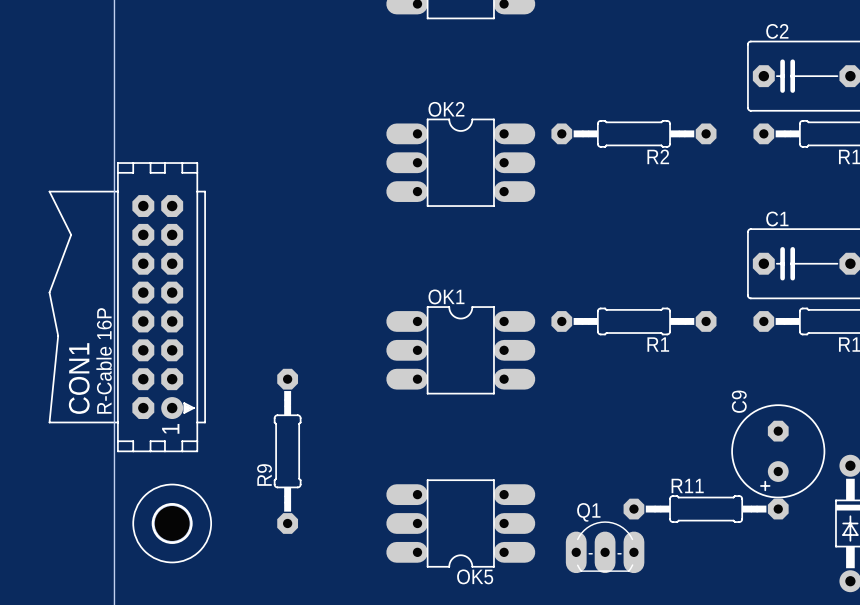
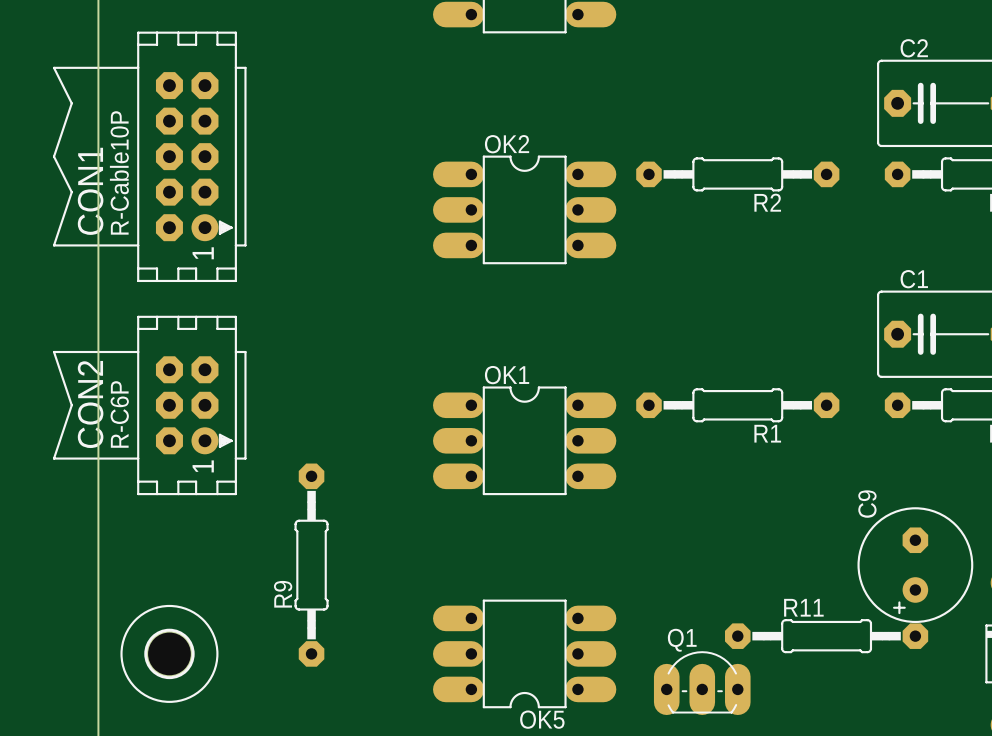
CON1 footprint: [48, 162, 206, 453] -> [52, 31, 247, 283]
CON2: none -> (149, 405)
CON1 name position: CON1 (79, 378) -> CON1 (90, 191)

